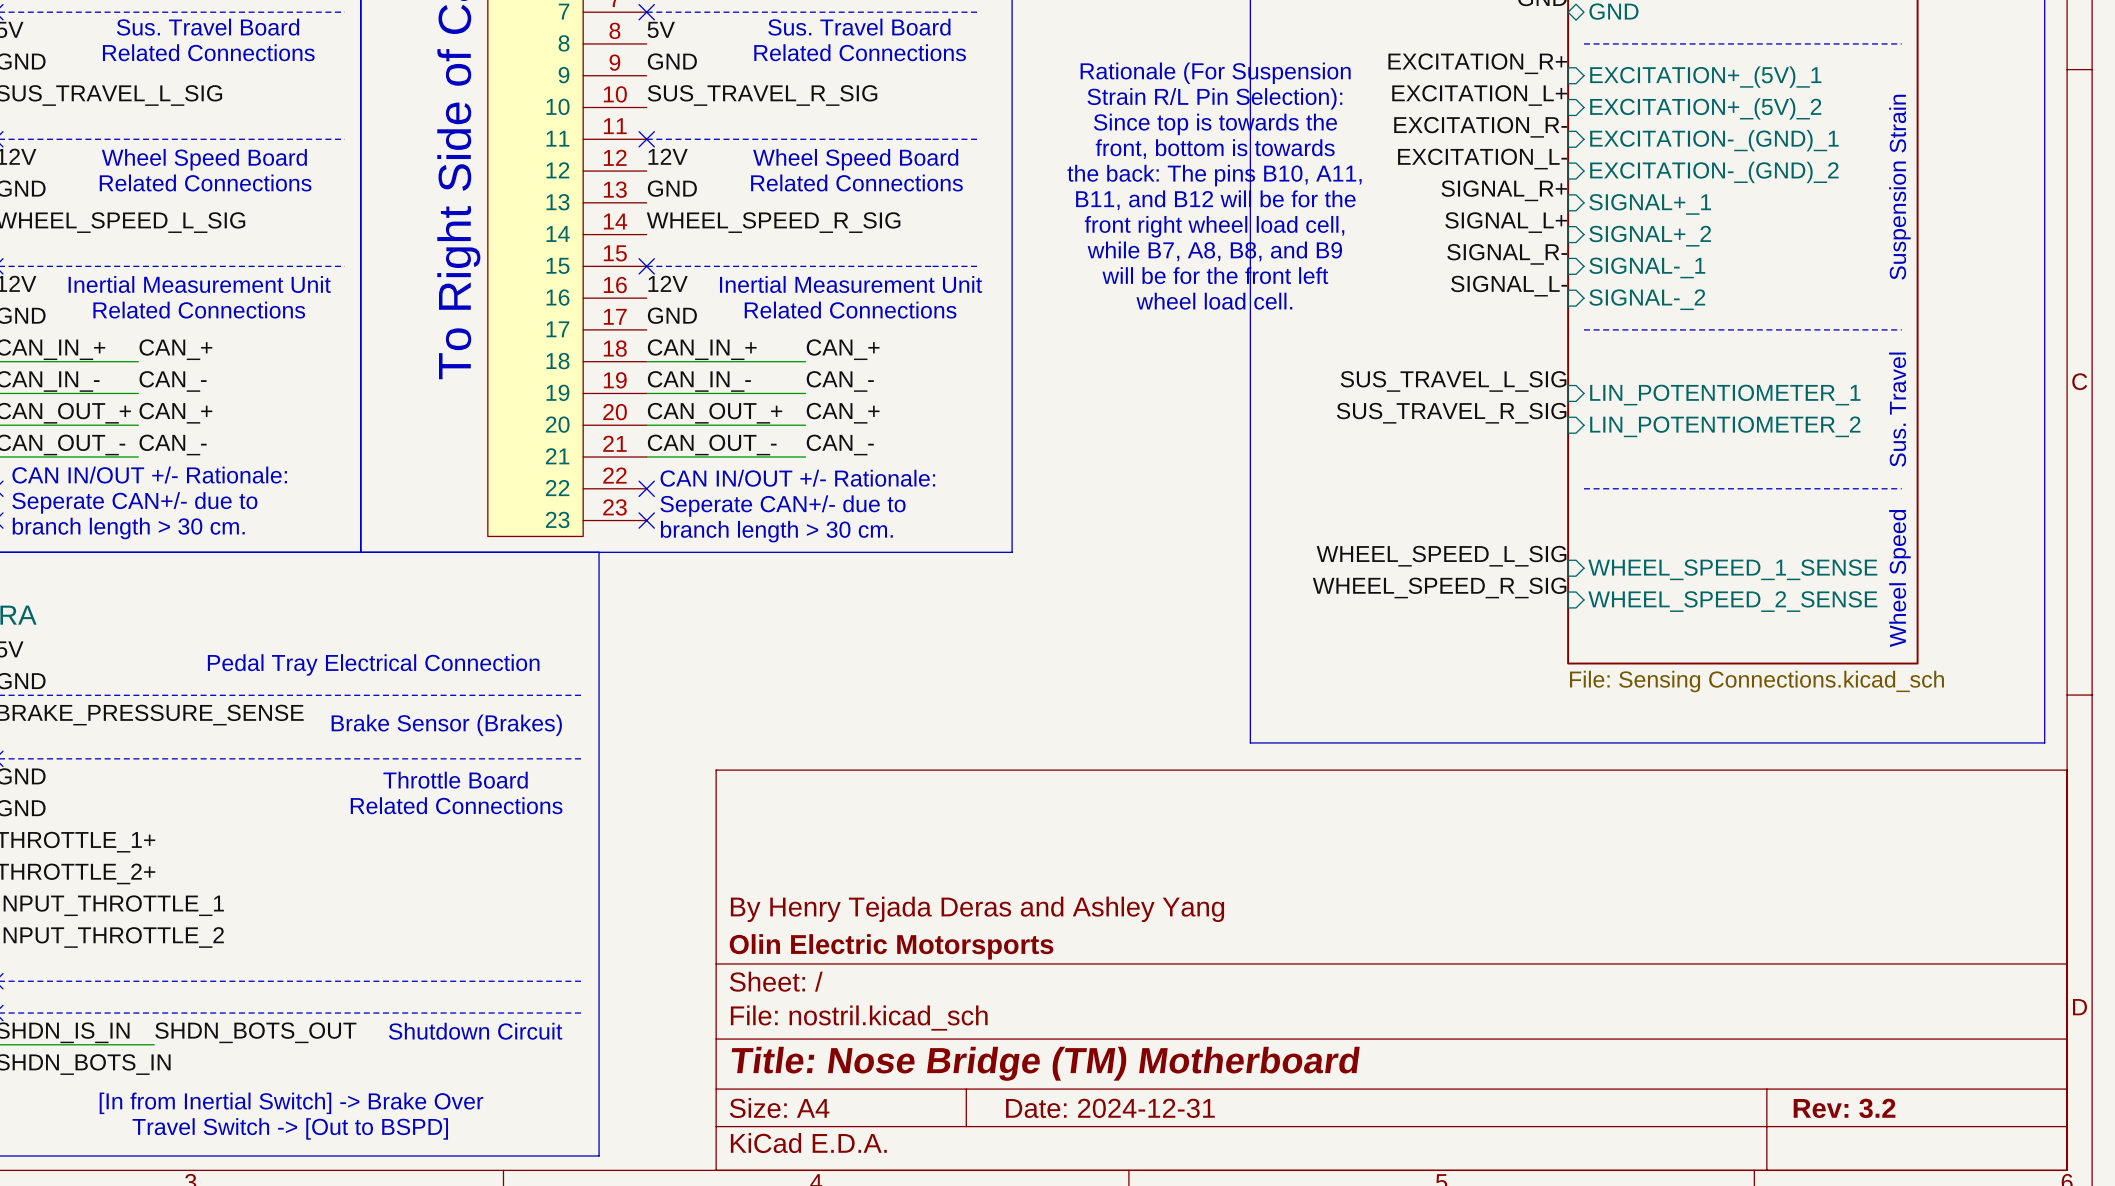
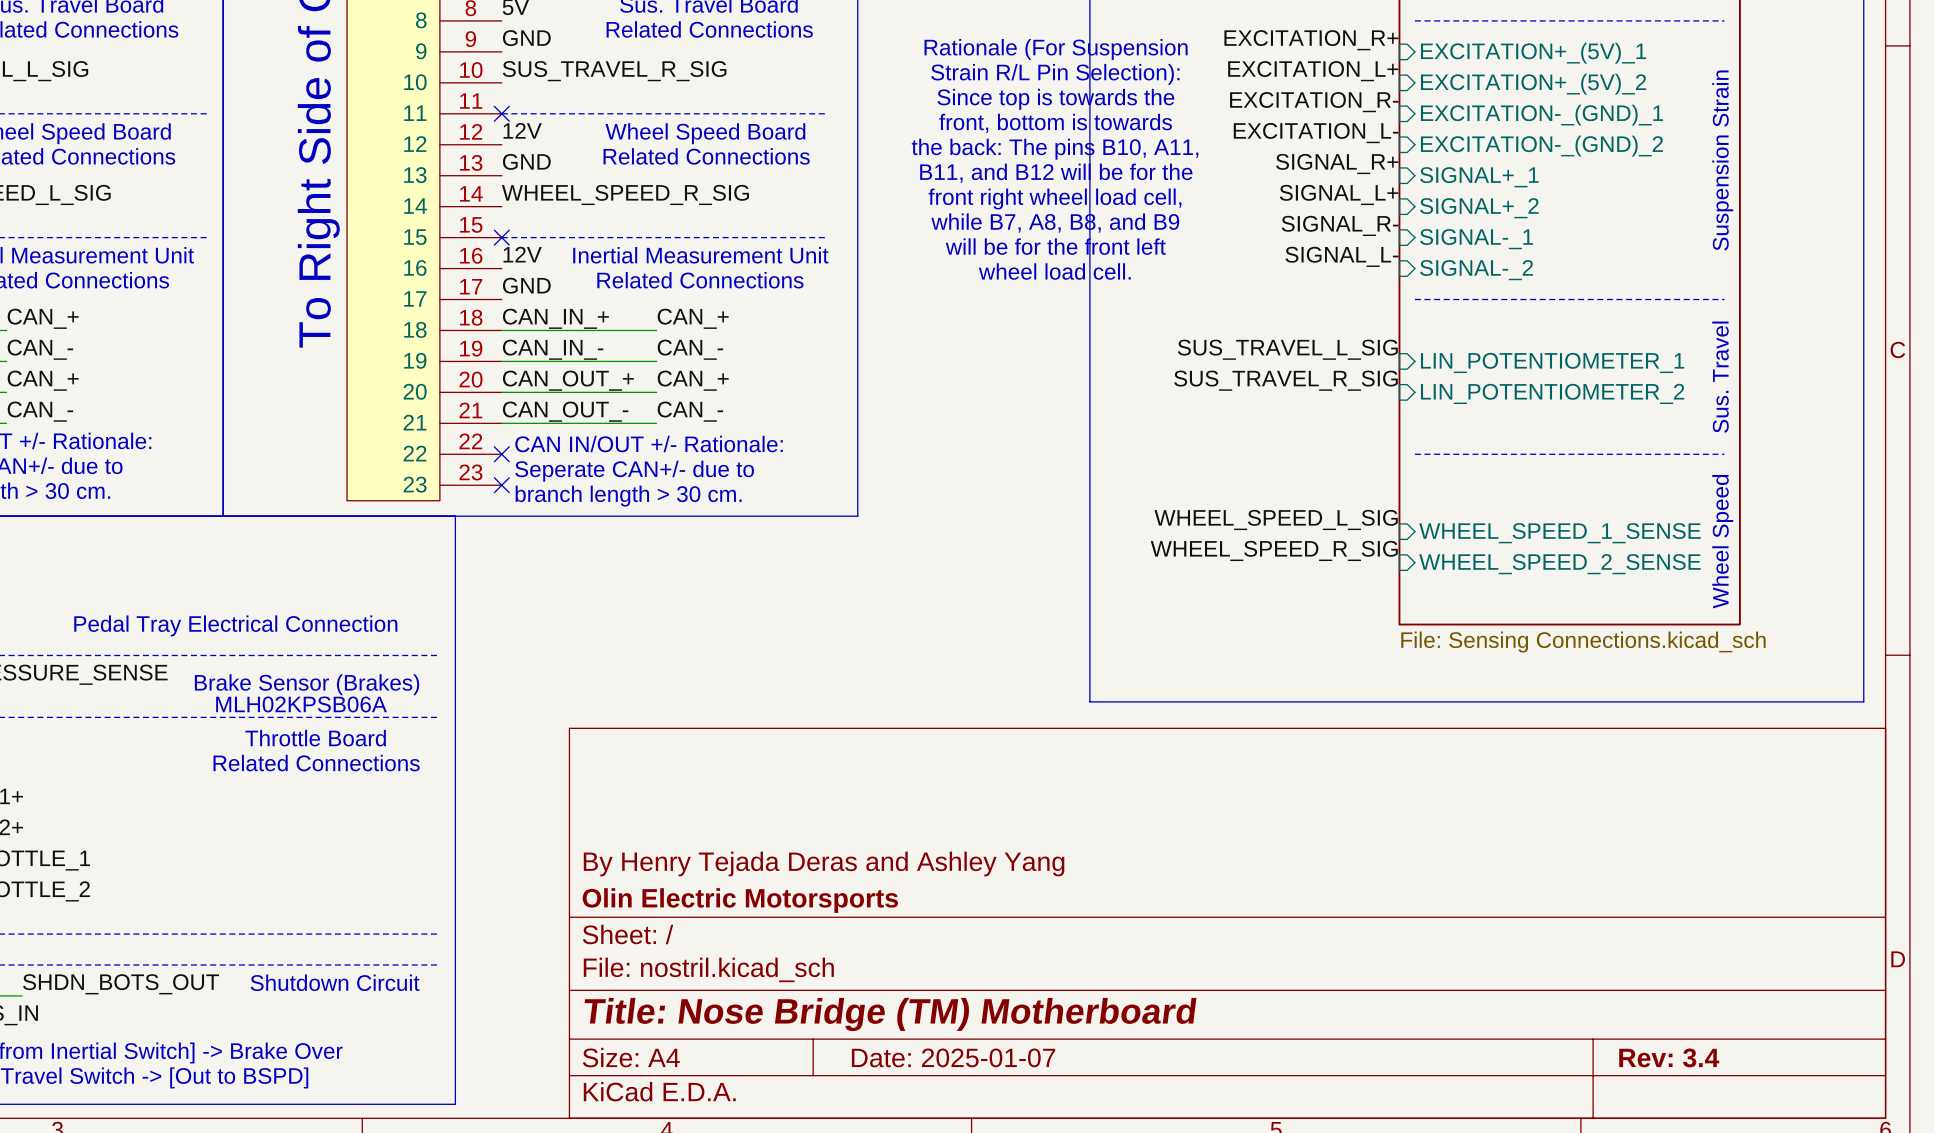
text: none -> MLH02KPSB06A (301, 704)
title block: Date: 2024-12-31 (1110, 1108) -> Date: 2025-01-07 (953, 1057)
title block: Rev: 3.2 (1844, 1108) -> Rev: 3.4 (1669, 1057)

